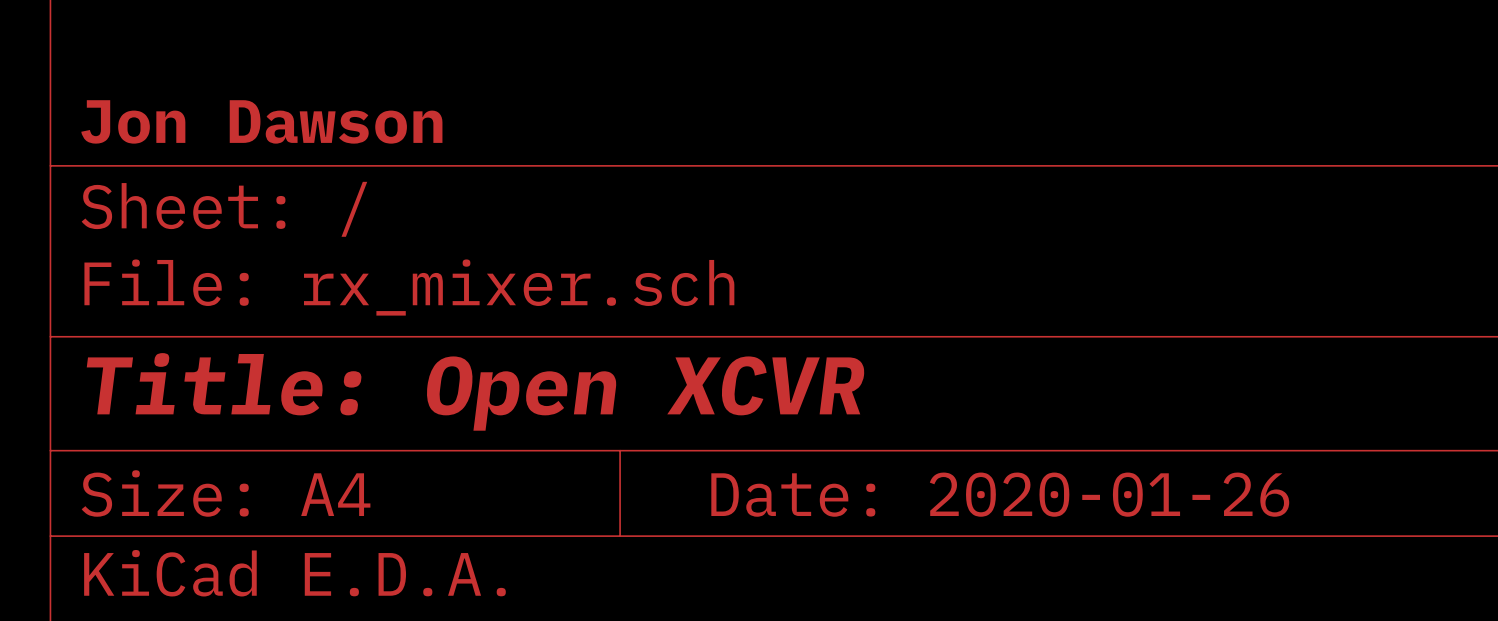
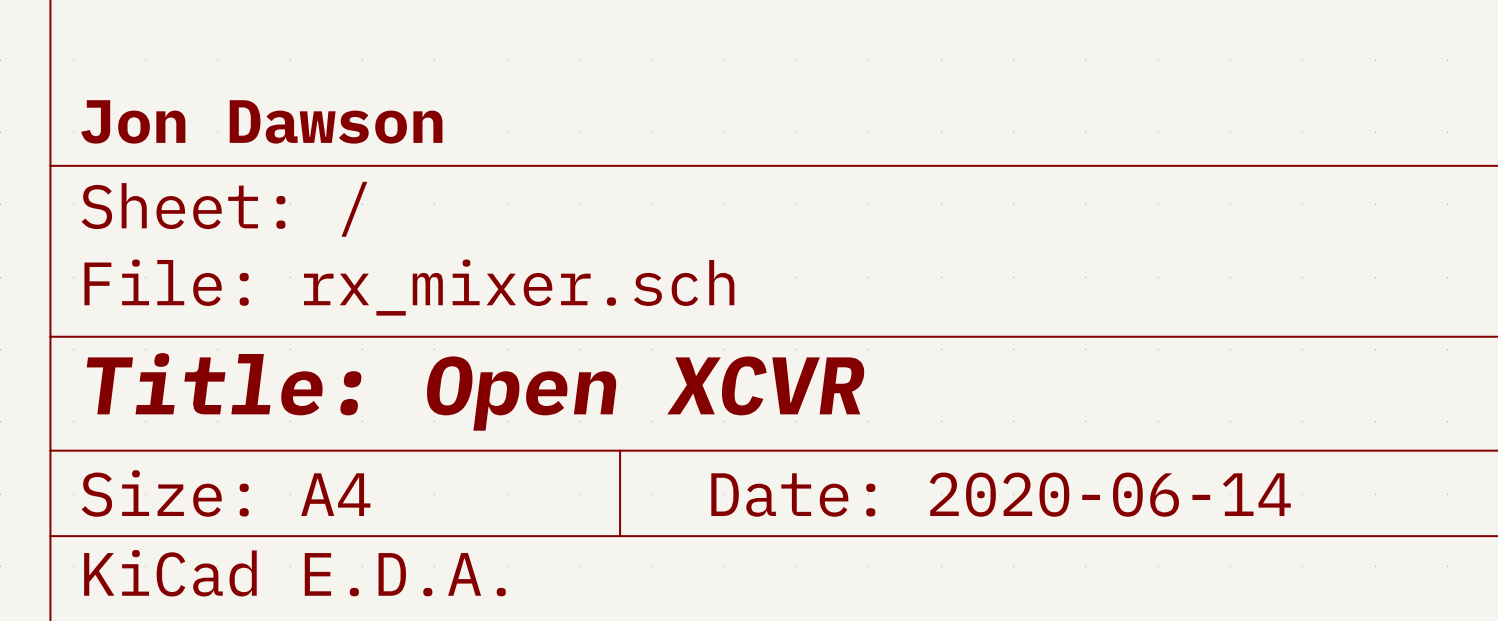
title block: Date: 2020-01-26 (1000, 494) -> Date: 2020-06-14 (1001, 494)

